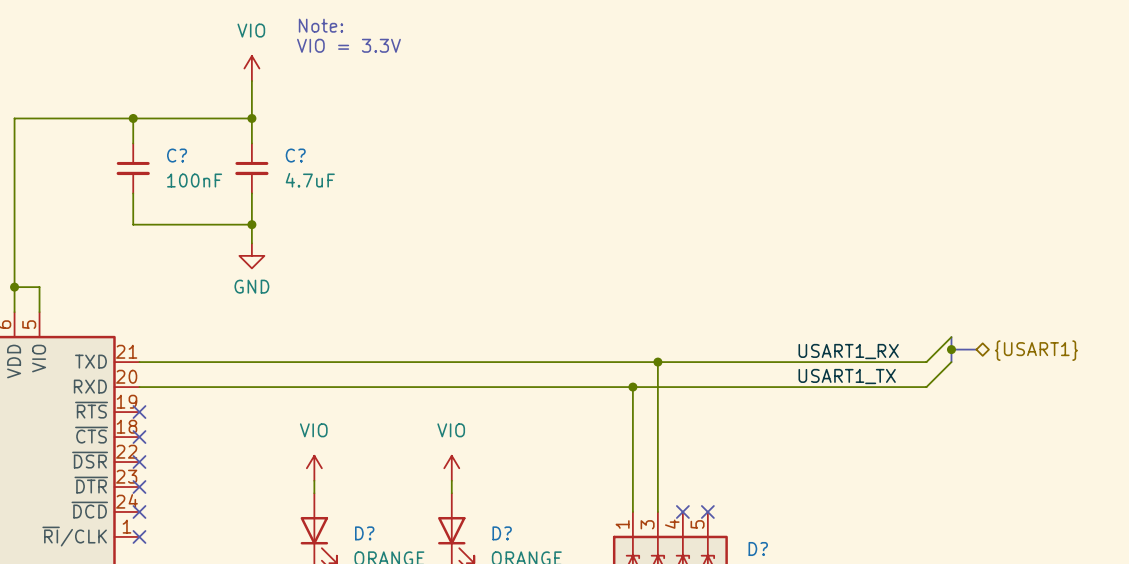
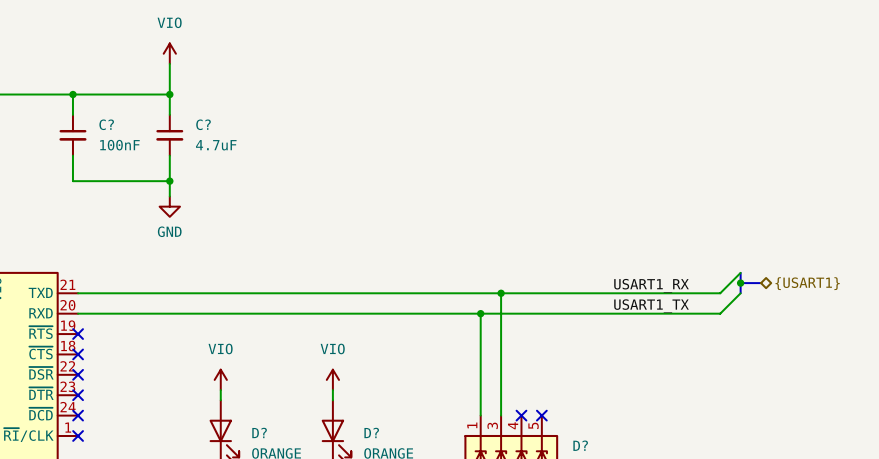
text: Note: (321, 25) -> none
text: VIO = 3.3V (348, 45) -> none

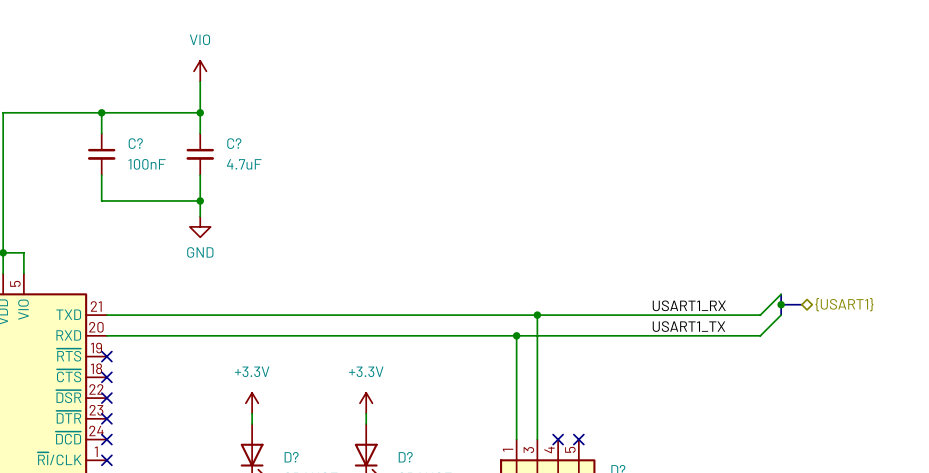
power symbol: VIO (220, 379) -> +3.3V (252, 403)
power symbol: VIO (332, 379) -> +3.3V (366, 403)

